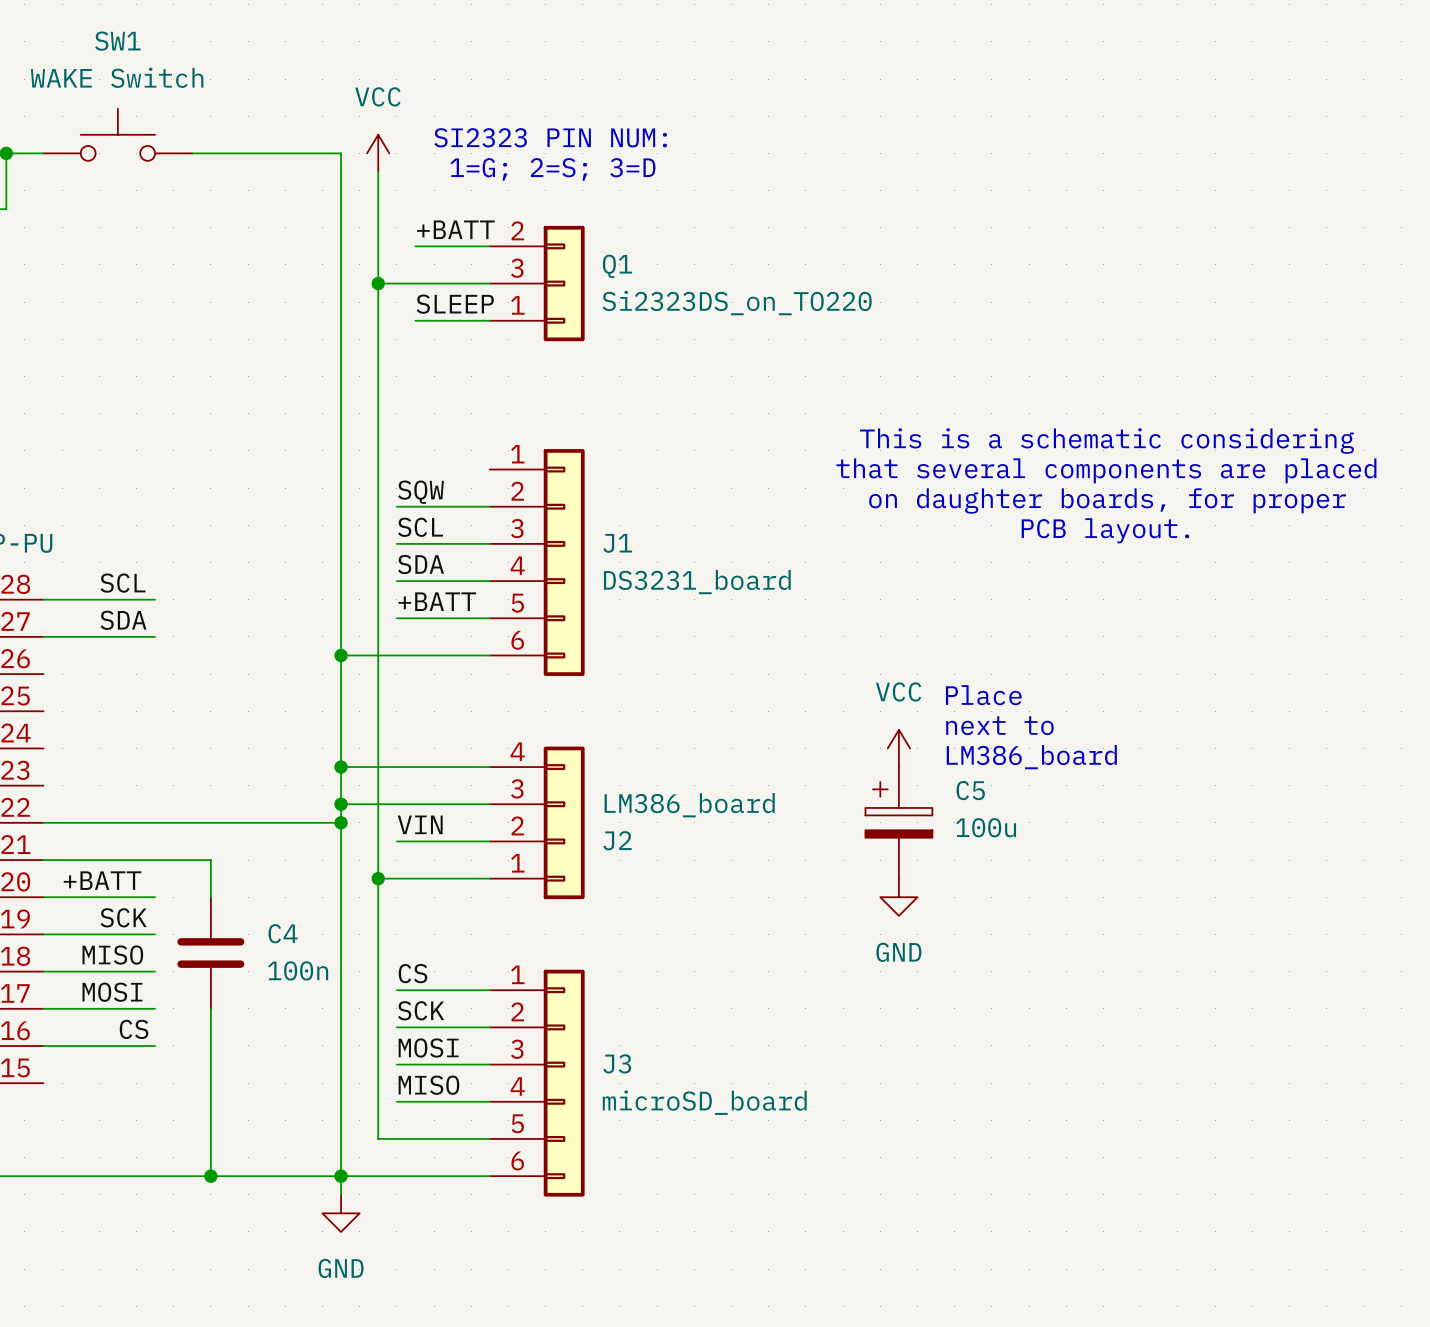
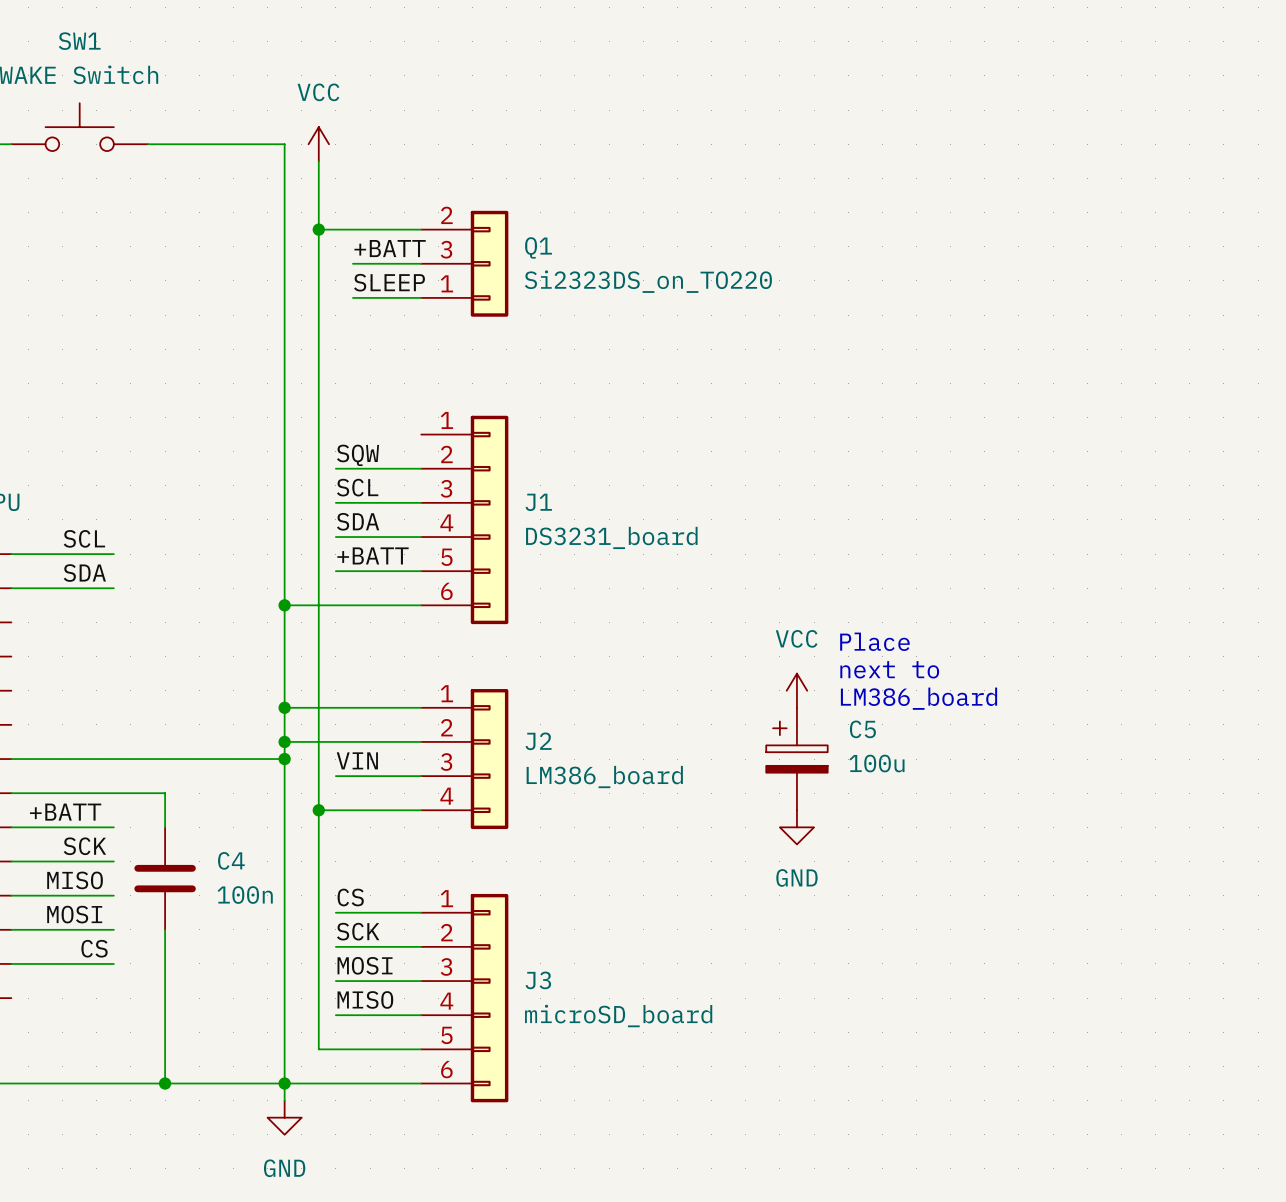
text: SI2323 PIN NUM: (550, 137) -> none
text: 1=G; 2=S; 3=D (553, 169) -> none
label position: +BATT (455, 229) -> +BATT (390, 248)
wire: (378, 283) (415, 283) -> (318, 229) (352, 229)
junction position: (378, 283) -> (318, 229)
text: This is a schematic considering (1107, 441) -> none
text: that several components are placed (1106, 470) -> none
text: on daughter boards, for proper (1107, 500) -> none
text: PCB layout. (1105, 530) -> none
J2 flip: as is (564, 822) -> up-down (489, 759)

